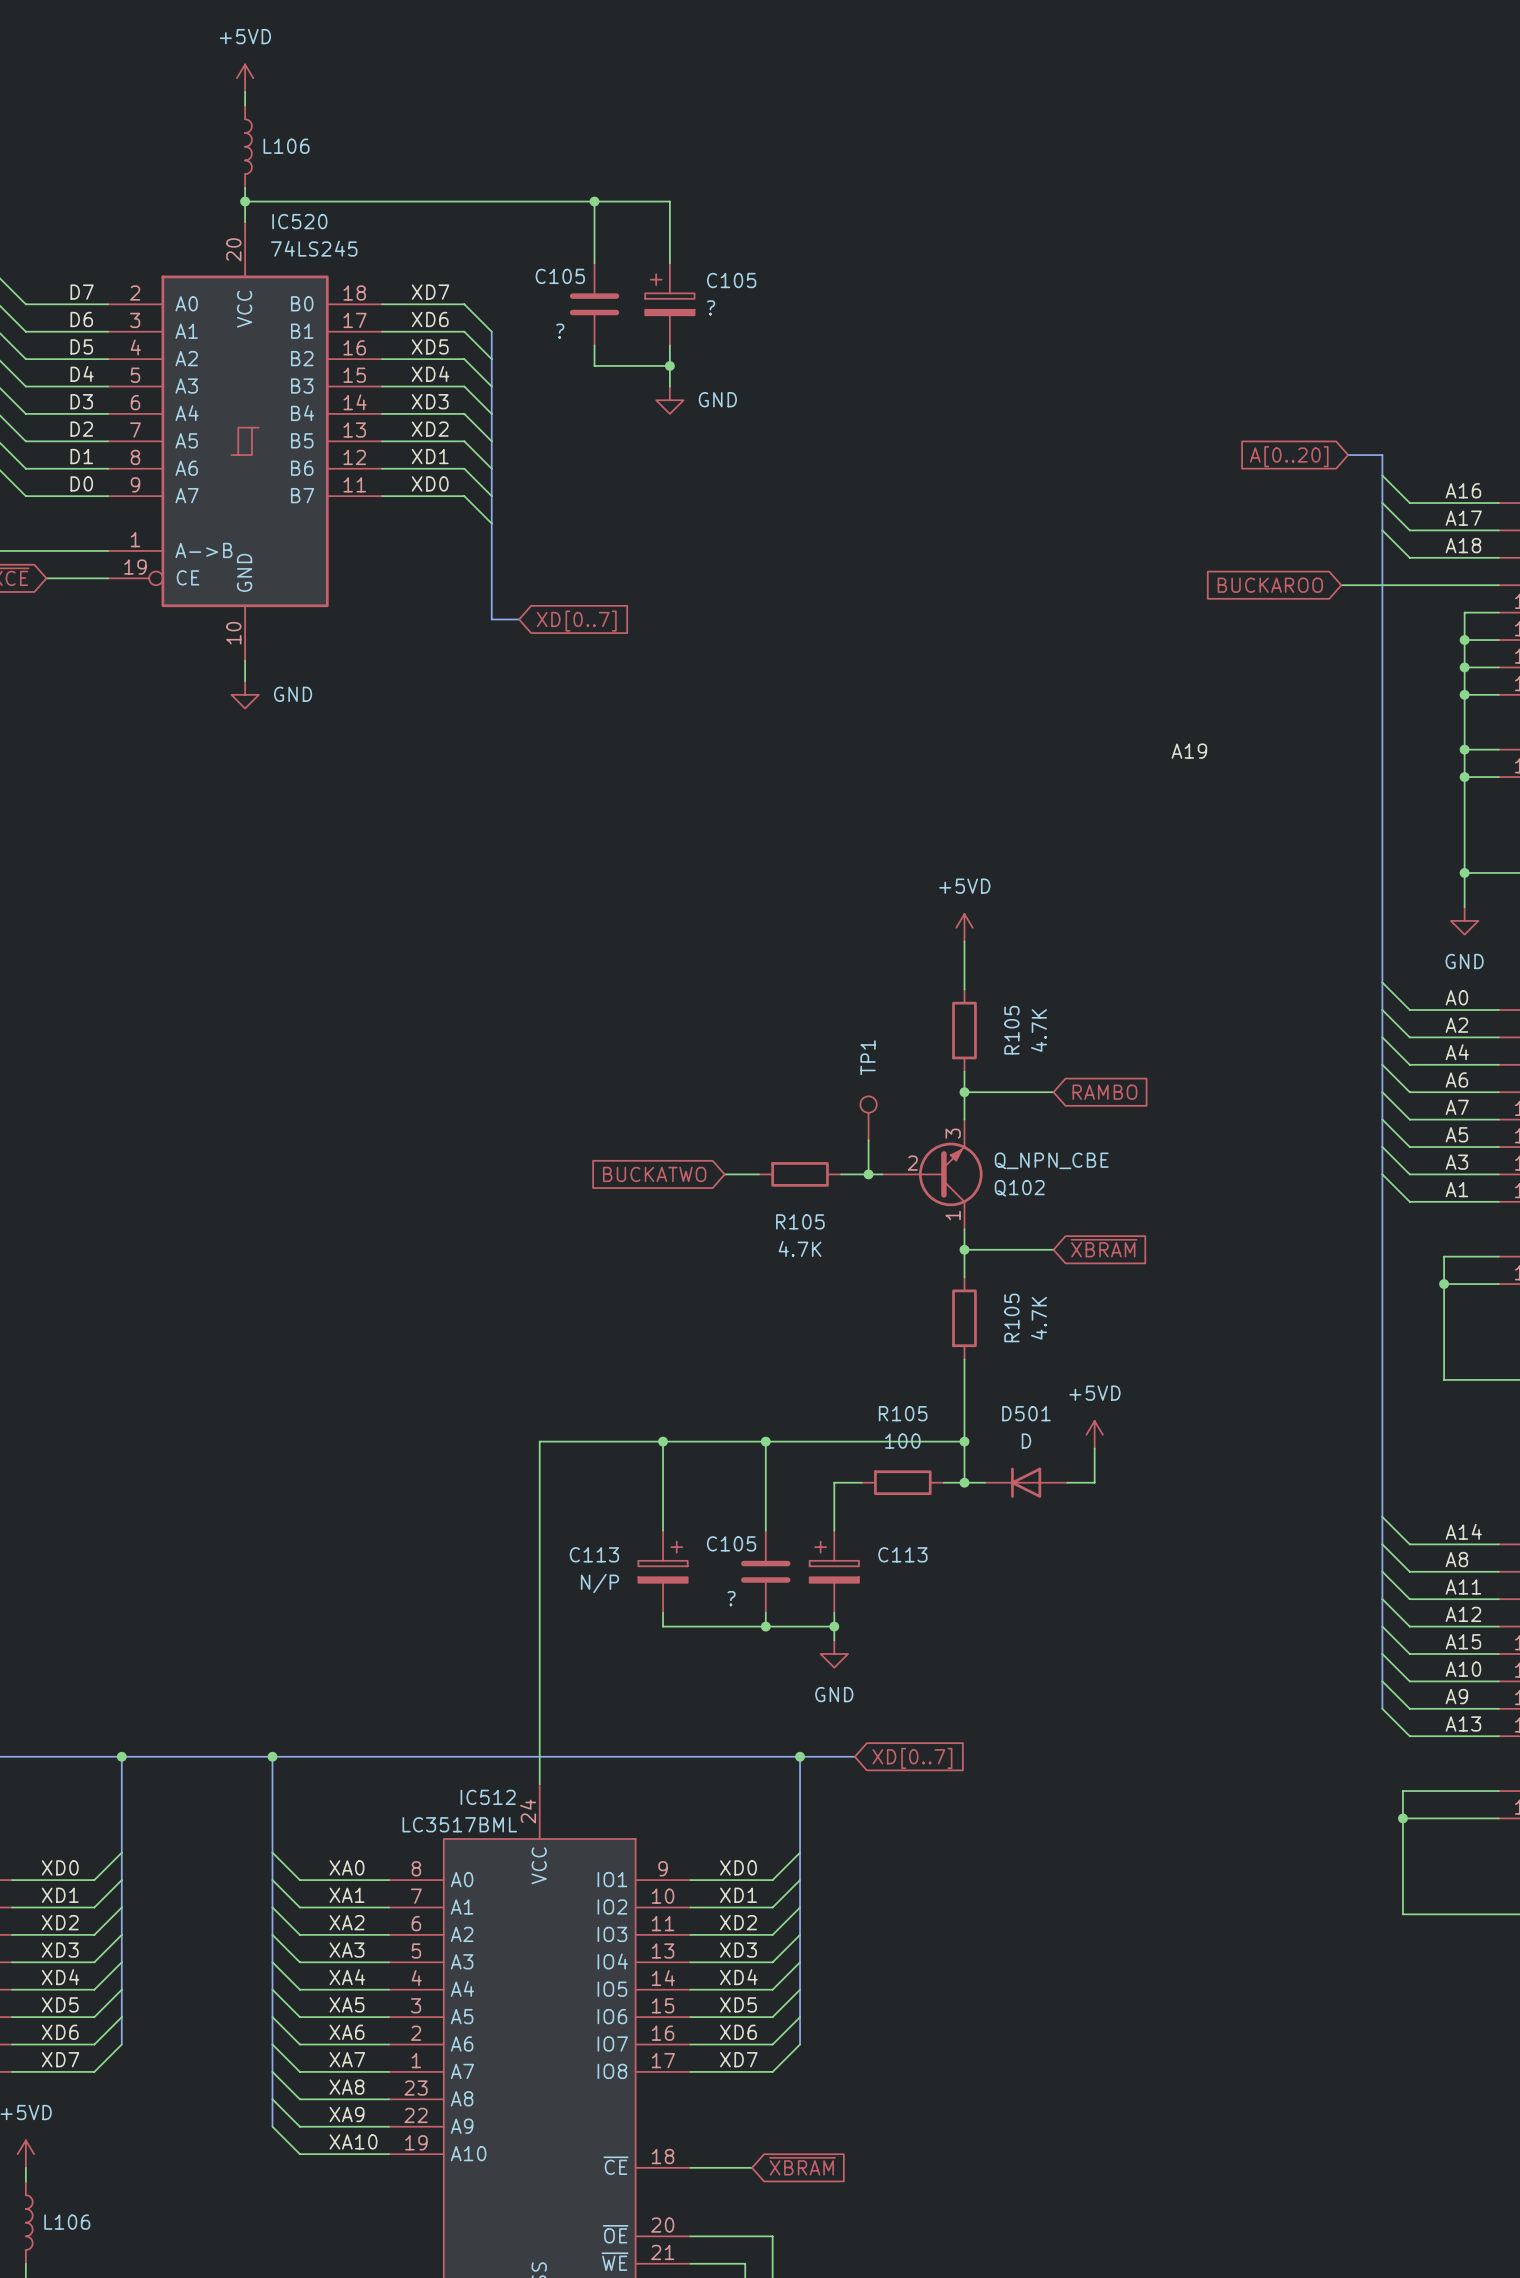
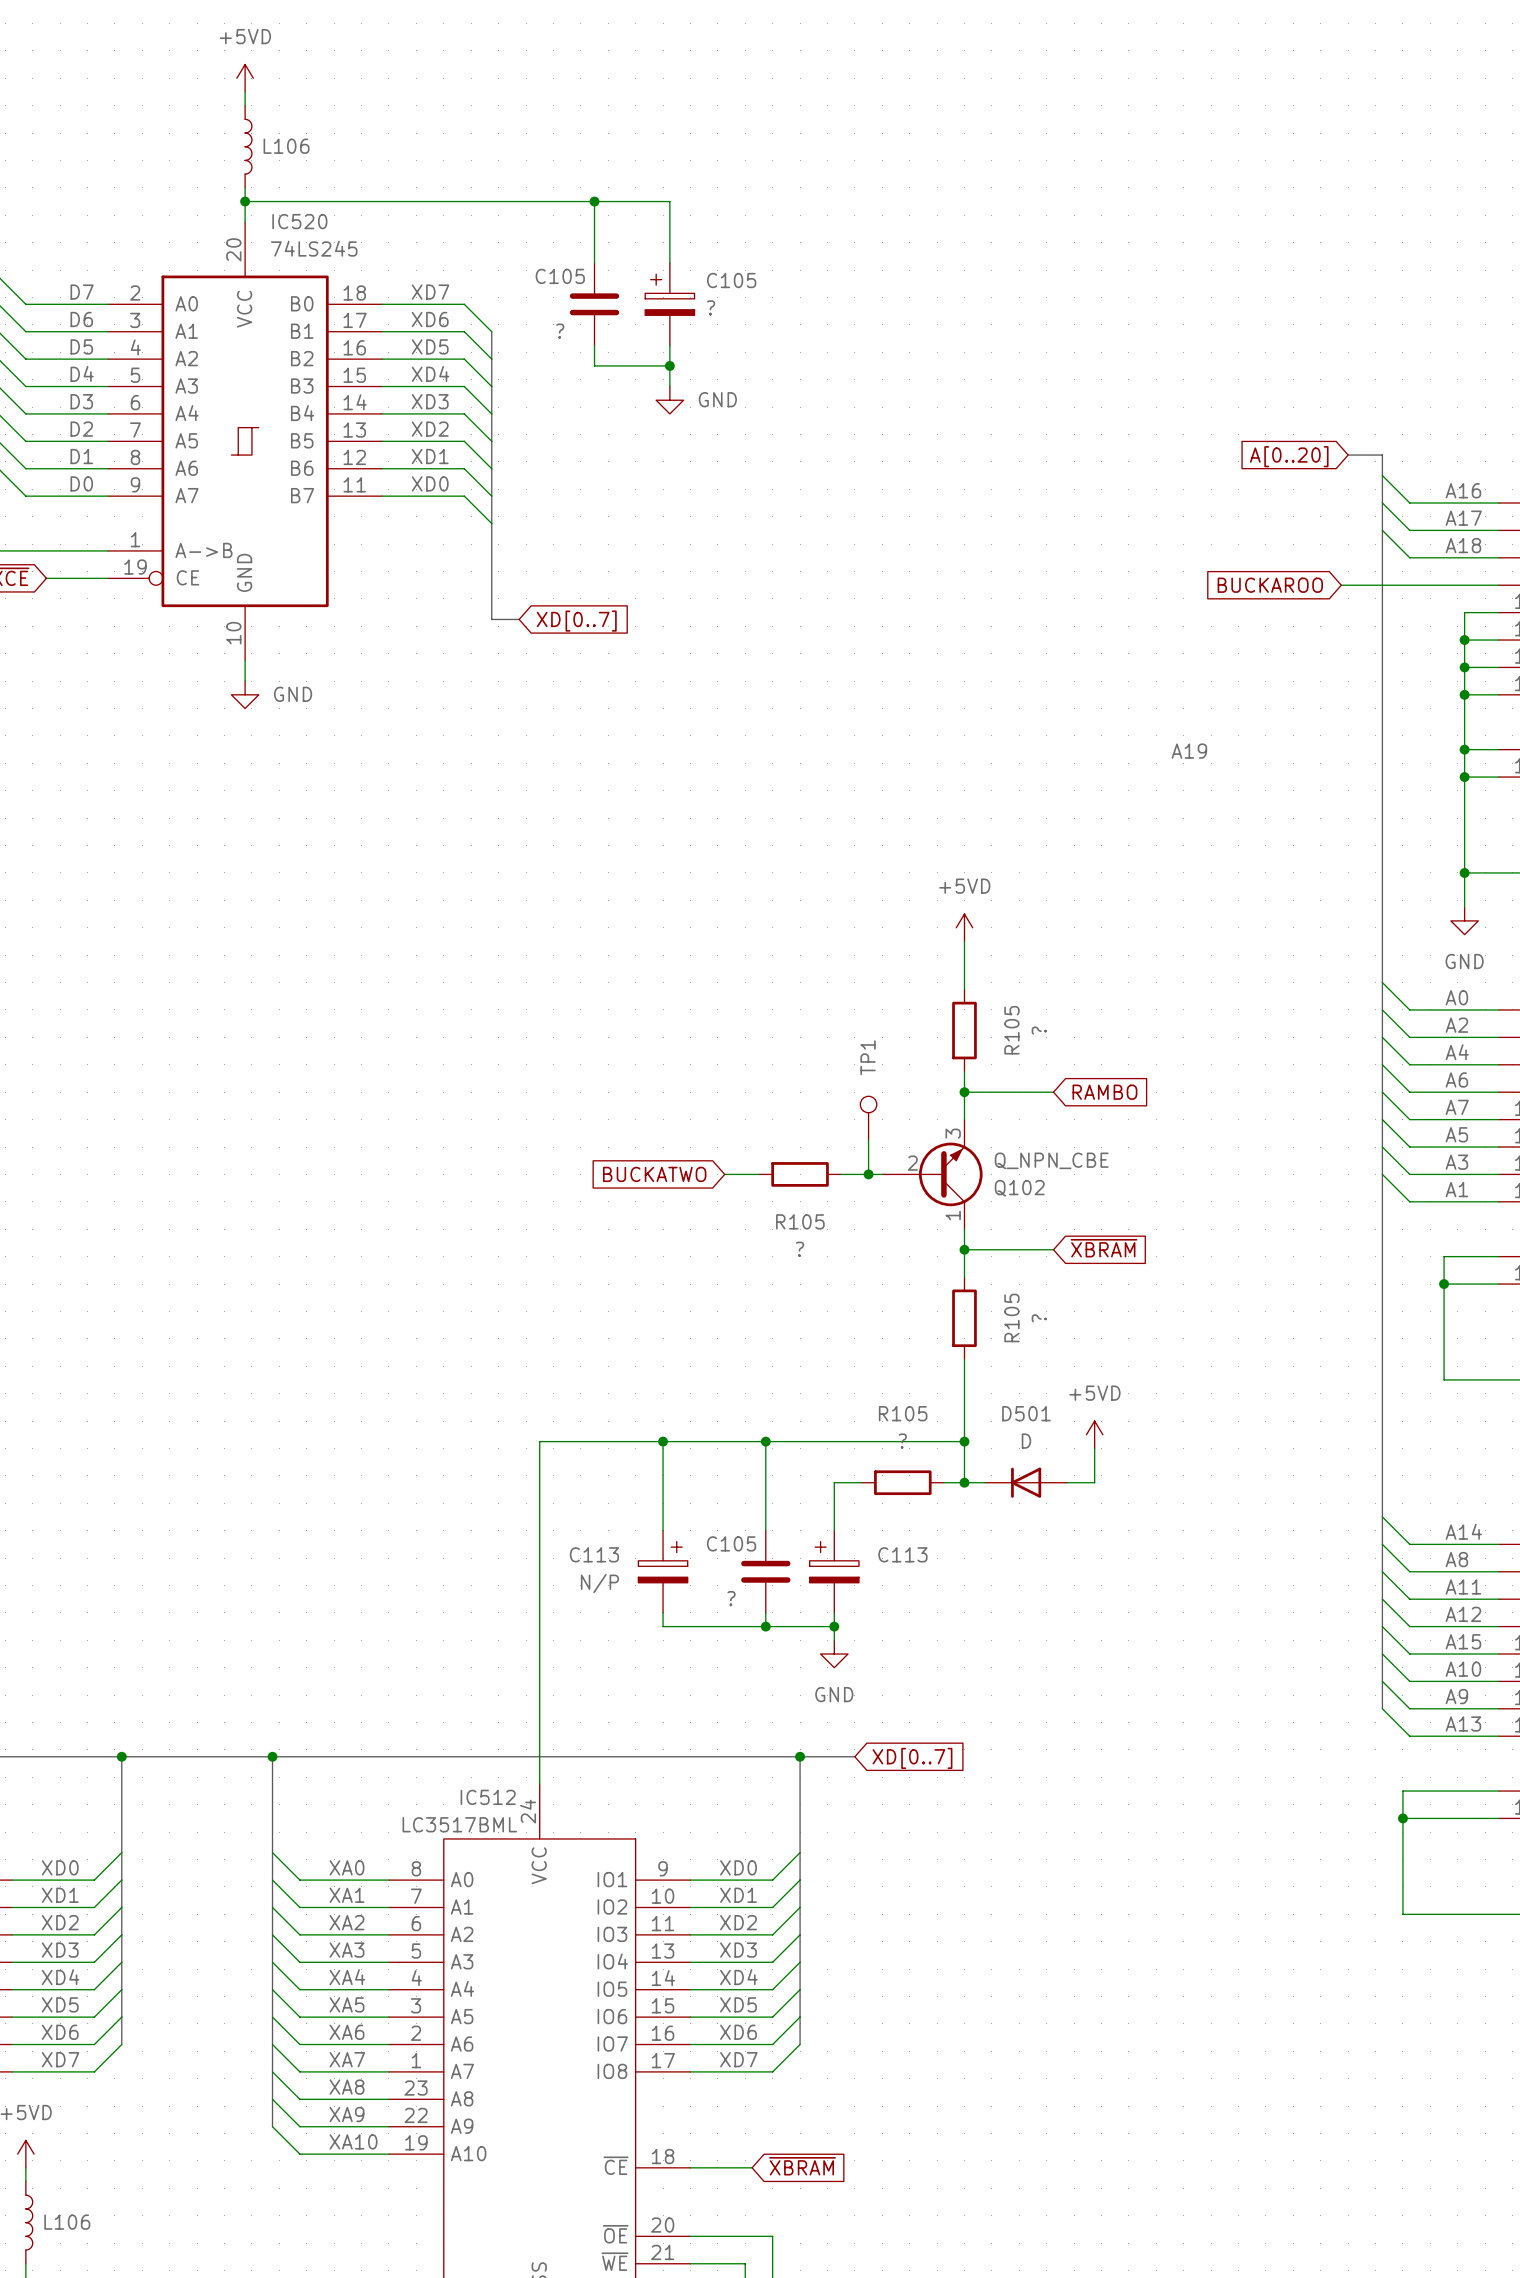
R105 value: 4.7K (1039, 1030) -> ? (1039, 1030)
R105 value: 4.7K (800, 1248) -> ? (800, 1249)
R105 value: 4.7K (1039, 1318) -> ? (1039, 1318)
R105 value: 100 (902, 1441) -> ? (902, 1441)

